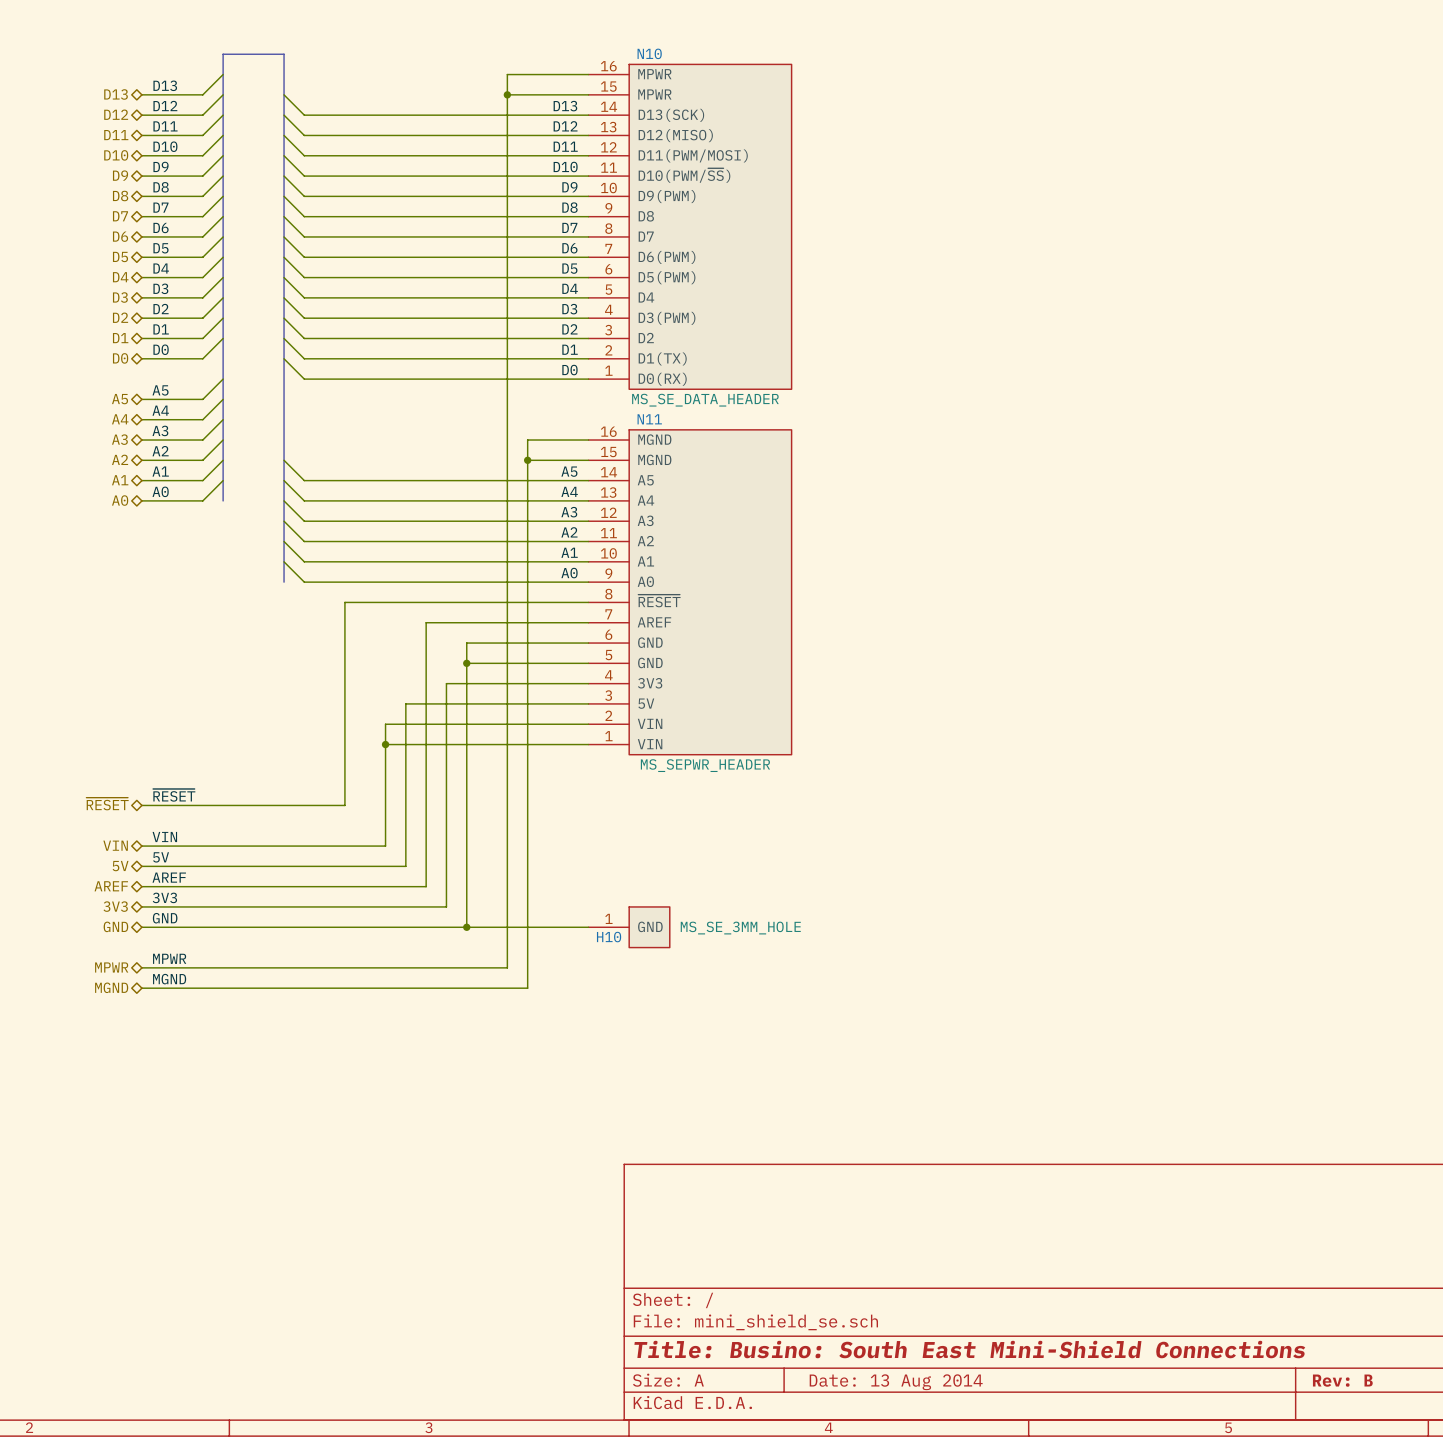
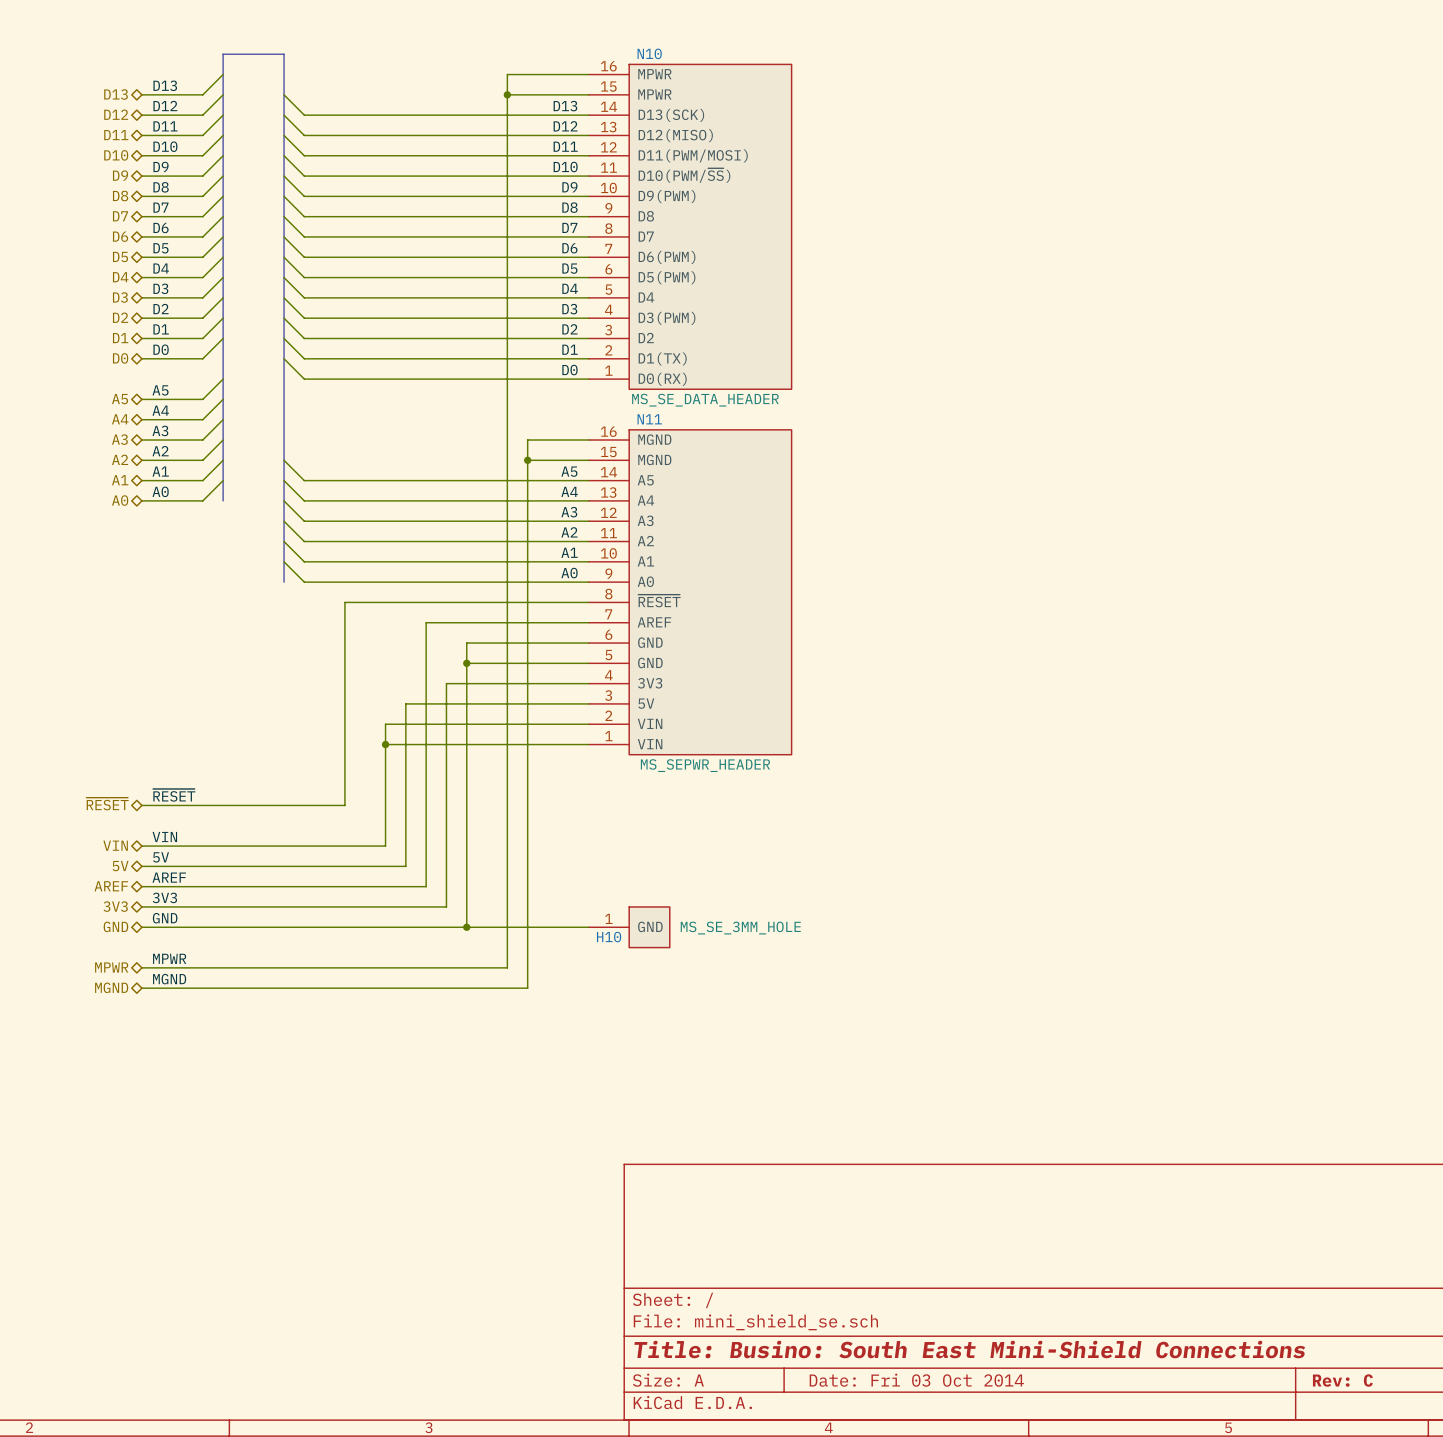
title block: Rev: B (1342, 1380) -> Rev: C (1342, 1380)
title block: Date: 13 Aug 2014 (896, 1382) -> Date: Fri 03 Oct 2014 (916, 1380)

